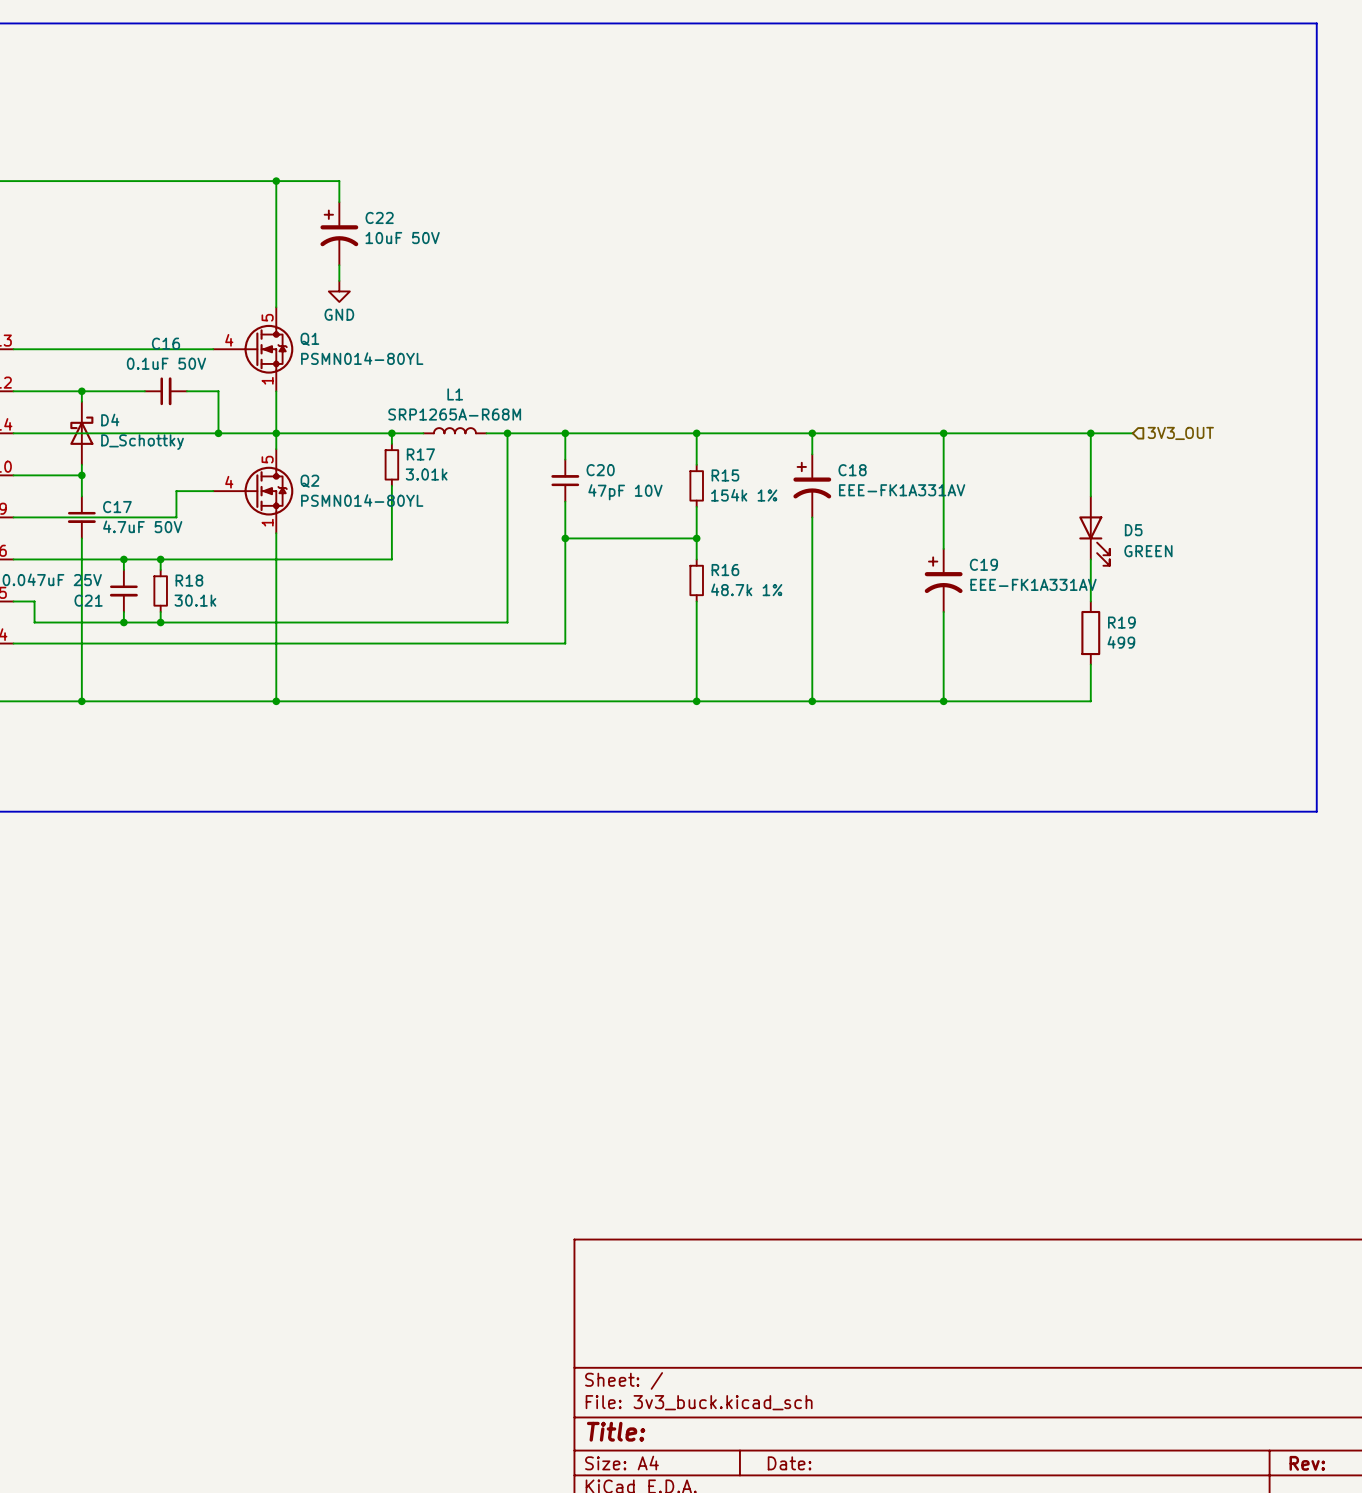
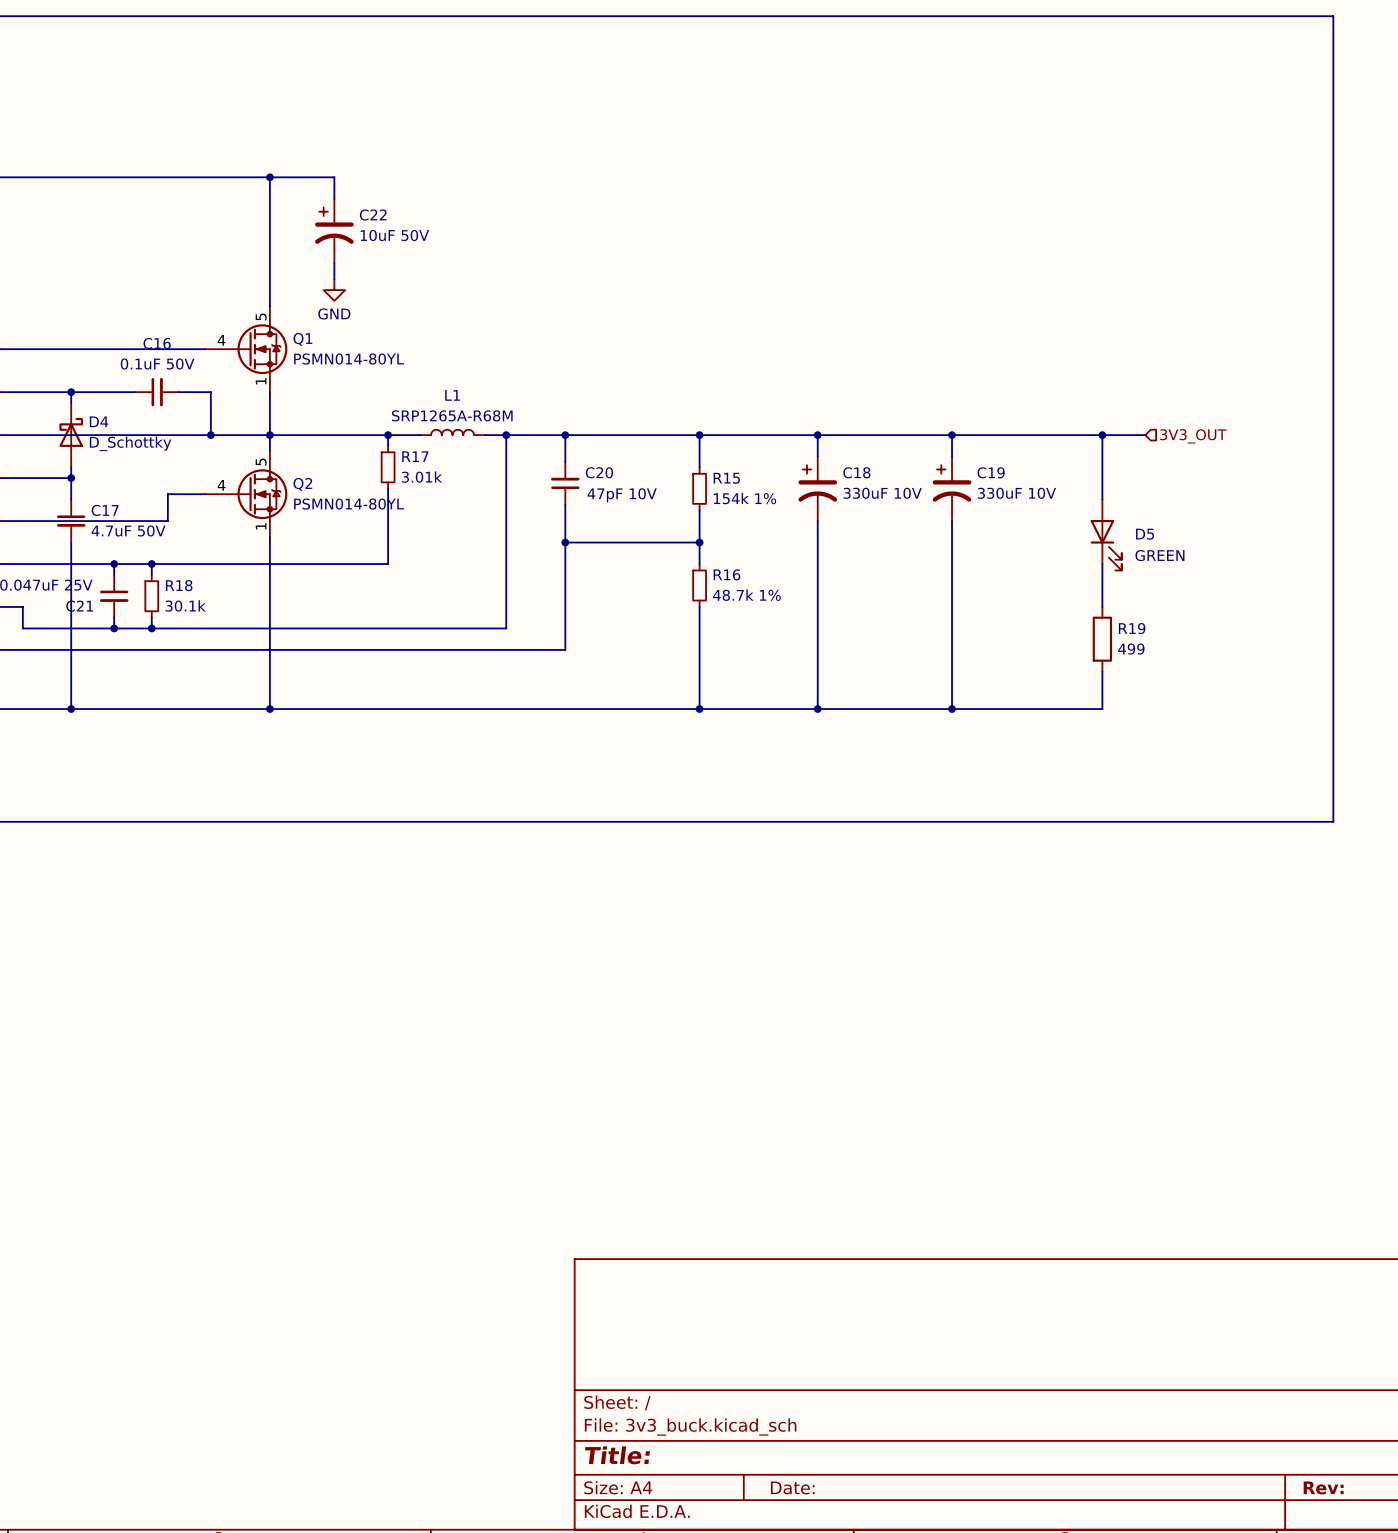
C18 value: EEE-FK1A331AV (902, 490) -> 330uF 10V (882, 493)
C19 position: (943, 580) -> (952, 488)
C19 value: EEE-FK1A331AV (1033, 584) -> 330uF 10V (1016, 493)

